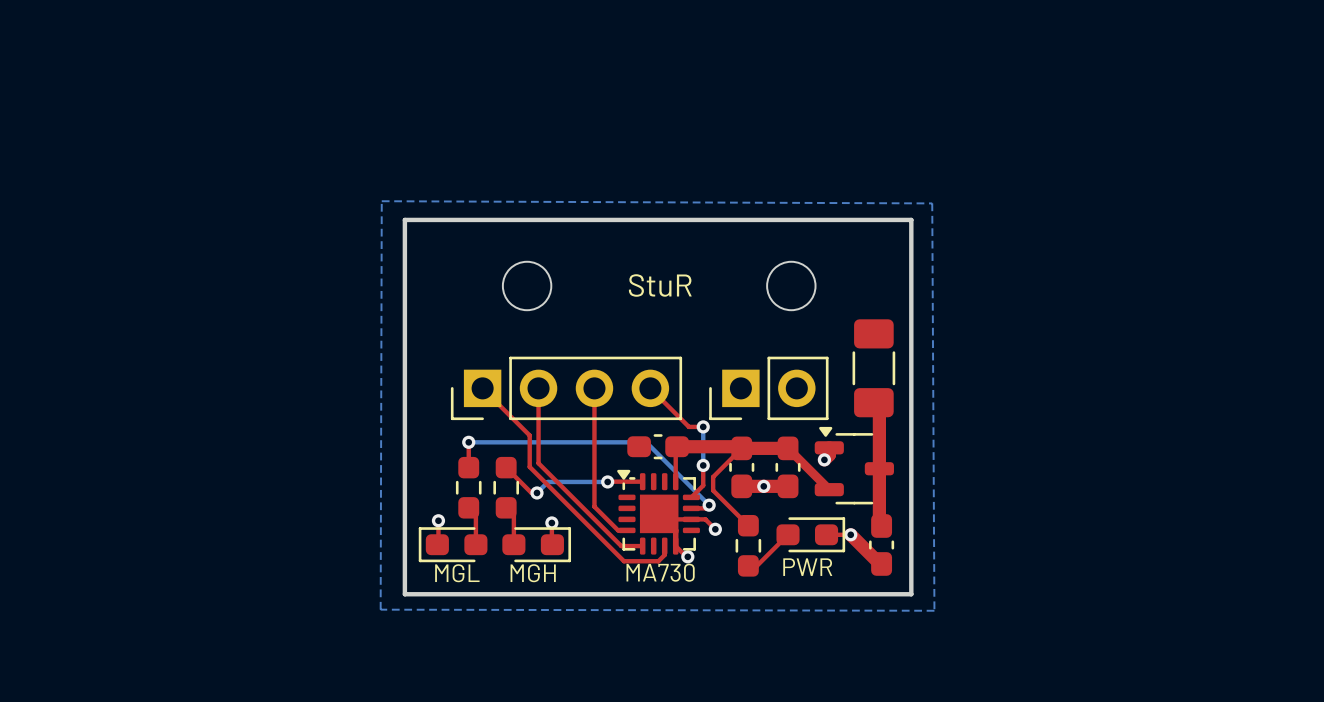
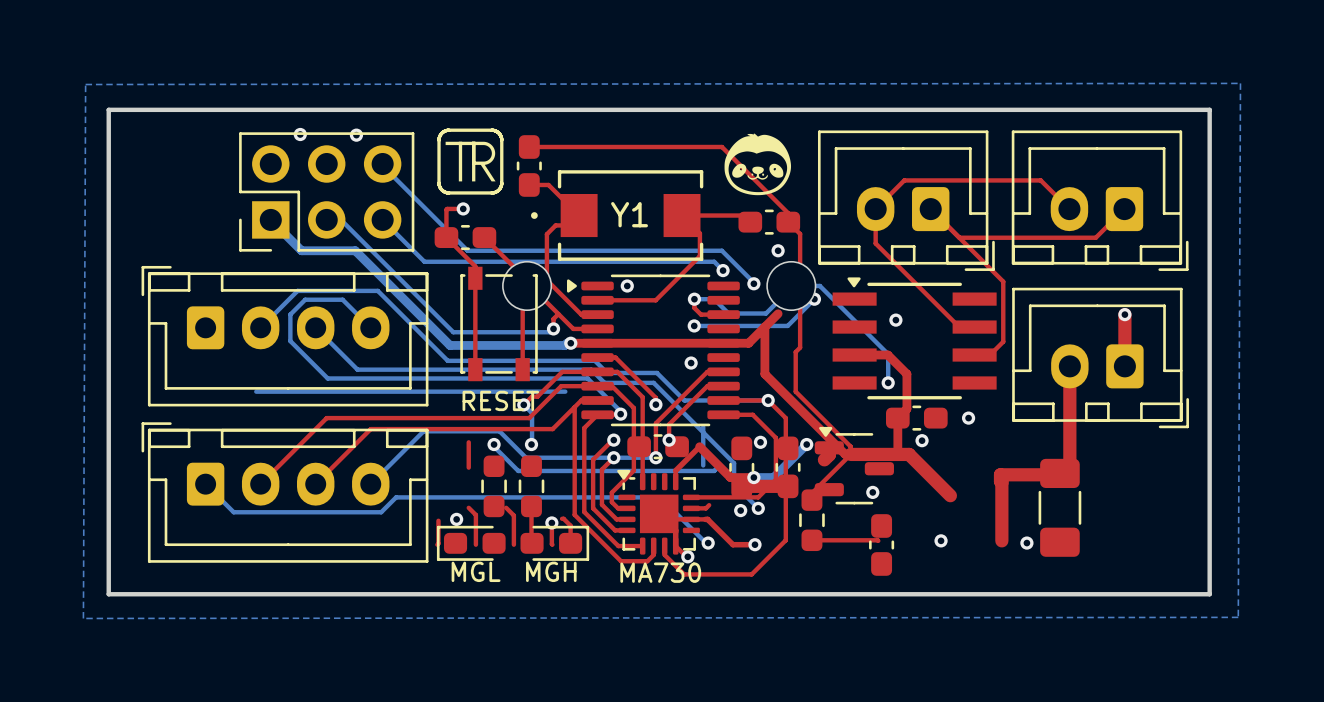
bottom zone outline: none -> (1240, 83) (85, 84) (83, 618) (1238, 617) (1240, 83)
line: none -> (447, 130) (441, 133) (439, 139) (439, 183) (441, 189) (449, 192) (492, 192) (498, 190) (501, 182) (501, 139) (499, 133) (492, 130) (447, 130)
drawing: none -> [724, 133, 792, 196]
via: none -> (300, 134)
via: none -> (356, 135)
drawing: none -> [445, 141, 496, 182]
top track: none -> (529, 146) (721, 146) (788, 213) (788, 222) (800, 233) (800, 347) (795, 352) (795, 391) (850, 446) (850, 454)
bottom track: none -> (382, 164) (467, 250) (721, 250) (753, 283)
part: none -> (529, 165)
top track: none -> (529, 184) (548, 184) (579, 215) (569, 225) (555, 225) (546, 234) (546, 280) (581, 314) (597, 314)
part: none -> (326, 191)
part: none -> (906, 200)
part: none -> (1100, 200)
bottom zone outline: (381, 201) (380, 609) (934, 610) (932, 203) (381, 201) -> none
top track: none -> (463, 208) (446, 209) (446, 237) (475, 266) (475, 369)
via: none -> (463, 208)
top track: none -> (930, 209) (1003, 281) (1003, 341) (990, 355) (974, 355)
top track: none -> (1069, 209) (1040, 180) (904, 180) (875, 209) (875, 243) (959, 327) (974, 327)
top track: none -> (1124, 209) (1095, 237) (959, 237)
Y1: none -> (617, 215)
bottom track: none -> (270, 219) (301, 250) (355, 250) (450, 345) (564, 345) (570, 343)
bottom track: none -> (326, 219) (341, 219) (453, 332) (550, 332) (553, 328)
bottom track: none -> (382, 219) (424, 261) (714, 261) (723, 270)
top track: none -> (750, 222) (743, 215) (682, 215) (699, 233) (699, 256) (655, 300) (597, 300)
part: none -> (769, 222)
part: none -> (465, 237)
top track: none -> (484, 237) (522, 275) (522, 369)
via: none -> (778, 250)
via: none -> (723, 270)
top track: none -> (522, 278) (573, 328) (597, 328)
via: none -> (753, 283)
via: none -> (627, 285)
text: StuR (660, 285) -> none
top track: none -> (694, 299) (694, 308) (701, 314) (723, 314)
bottom track: none -> (694, 299) (714, 299) (728, 313) (765, 313) (793, 285) (819, 285) (888, 354) (888, 382)
via: none -> (694, 299)
bottom track: none -> (814, 299) (787, 325) (694, 325)
via: none -> (814, 299)
top track: none -> (778, 313) (748, 343) (570, 343)
top track: none -> (558, 314) (553, 319) (553, 328)
top track: none -> (1124, 314) (1124, 366)
via: none -> (1124, 314)
via: none -> (895, 320)
part: none -> RESET (499, 323)
via: none -> (694, 325)
bottom track: none -> (260, 327) (297, 290) (377, 290) (447, 360) (594, 360) (607, 372) (657, 372) (684, 400) (768, 400)
bottom track: none -> (315, 327) (357, 369) (591, 369) (604, 382) (653, 382) (734, 463) (734, 484) (758, 508)
bottom track: none -> (370, 327) (342, 299) (305, 299) (290, 314) (290, 341) (327, 378) (587, 378) (620, 411) (620, 414)
top track: none -> (764, 327) (764, 374) (845, 454) (850, 454)
via: none -> (553, 328)
part: none -> (285, 336)
part: none -> (914, 338)
via: none -> (570, 343)
part: none -> (653, 350)
top track: none -> (854, 355) (887, 355) (906, 374) (906, 409) (897, 418) (897, 454)
top track: none -> (597, 357) (615, 357) (655, 397) (655, 404)
part: none -> (1100, 357)
via: none -> (691, 363)
top track: none -> (1069, 366) (1069, 463) (1058, 474) (1000, 474) (1001, 540)
part position: (873, 368) -> (1059, 507)
top track: none -> (723, 371) (707, 371) (655, 423) (655, 457)
via: none -> (888, 382)
top track: none -> (723, 386) (707, 386) (669, 424) (669, 440)
top track: (482, 388) (529, 435) (529, 466) (624, 561) -> (574, 407) (574, 514) (621, 561) (624, 561)
top track: (538, 388) (538, 463) (621, 546) -> (620, 414) (597, 414) (584, 428) (584, 512) (618, 546) (621, 546)
part: (566, 388) -> none
top track: (594, 388) (594, 506) (618, 530) -> (613, 440) (593, 459) (593, 508) (615, 530) (618, 530)
top track: (650, 388) (688, 426) (703, 426) -> none
part: (768, 388) -> none
bottom track: none -> (256, 391) (565, 391)
top track: none -> (597, 400) (581, 400) (552, 429) (370, 429) (315, 484)
top track: none -> (723, 400) (768, 400) (785, 418) (785, 540) (751, 574) (684, 574) (664, 554)
via: none -> (768, 400)
top track: (873, 402) (879, 408) (879, 523) (881, 525) -> none
bottom track: none -> (523, 404) (532, 413) (531, 444)
via: none -> (523, 404)
via: none -> (655, 404)
via: none -> (620, 414)
part: none -> (916, 418)
via: none -> (968, 418)
via: (703, 426) -> none
via: none -> (613, 440)
via: none -> (669, 440)
via: none -> (922, 440)
bottom track: (468, 442) (646, 442) (709, 505) -> none
via position: (468, 442) -> (494, 444)
via: none -> (760, 442)
bottom track: none -> (494, 444) (518, 470) (714, 470) (718, 466)
via: none -> (531, 444)
bottom track: none -> (806, 444) (773, 477) (753, 477)
top track: (741, 448) (677, 446) (675, 470) -> (753, 477) (730, 477) (699, 446) (675, 470)
top track: (741, 448) (788, 448) (829, 489) -> none
top track: (741, 448) (713, 477) (713, 490) (748, 525) -> none
top track: none -> (850, 454) (909, 454) (950, 495)
top track: none -> (850, 454) (811, 493) (811, 500)
top track: none -> (613, 457) (601, 469) (601, 504) (616, 519) (627, 519)
via: none -> (613, 457)
bottom track: none -> (655, 457) (525, 457) (499, 431) (423, 431) (370, 484)
via: none -> (655, 457)
via position: (824, 459) -> (806, 444)
top track: (703, 465) (703, 485) (691, 497) -> (723, 414) (752, 414) (775, 437) (775, 479) (758, 497) (691, 497)
via: (703, 465) -> none
top track: (506, 467) (531, 492) (537, 492) -> none
top track: (607, 481) (642, 481) -> (523, 404) (532, 396) (537, 396) (562, 371) (617, 371) (642, 397) (642, 481)
bottom track: (607, 481) (548, 481) (537, 492) -> none
via: (607, 481) -> none
bottom track: none -> (205, 484) (233, 512) (381, 512) (396, 497) (660, 497) (705, 543) (708, 543)
top track: none -> (260, 484) (326, 418) (529, 418) (561, 386) (612, 386) (633, 408) (633, 470) (611, 492) (611, 502) (618, 508) (627, 508)
via position: (763, 486) -> (753, 477)
part position: (468, 487) -> (531, 486)
part position: (506, 487) -> (494, 486)
part: none -> (285, 492)
via: (537, 492) -> none
via: none -> (872, 492)
via: (709, 505) -> none
top track: none -> (531, 506) (531, 542)
via: none -> (758, 508)
via: none -> (740, 510)
part footprint: [776, 517, 846, 553] -> [799, 489, 825, 552]
top track: none -> (562, 518) (570, 525) (570, 543)
top track: (705, 519) (715, 529) -> (705, 519) (732, 544) (754, 544)
via position: (438, 520) -> (456, 519)
via position: (715, 529) -> (708, 543)
top track: (787, 534) (756, 565) (748, 565) -> none
top track: (826, 534) (850, 534) (881, 563) -> none
via: (850, 534) -> none
top track: none -> (811, 540) (878, 540)
via: none -> (941, 540)
via: none -> (1026, 543)
part position: (453, 544) -> (471, 543)
part position: (536, 544) -> (554, 543)
via: none -> (754, 544)
part: (748, 545) -> none
top track: (664, 554) (658, 561) (647, 561) -> (653, 546) (653, 554) (647, 561)
part value: PWR (807, 567) -> none
board edge: (404, 594) (404, 219) (911, 219) (911, 594) -> (404, 594) (108, 594) (108, 109) (1209, 109) (1209, 594) (911, 594)

